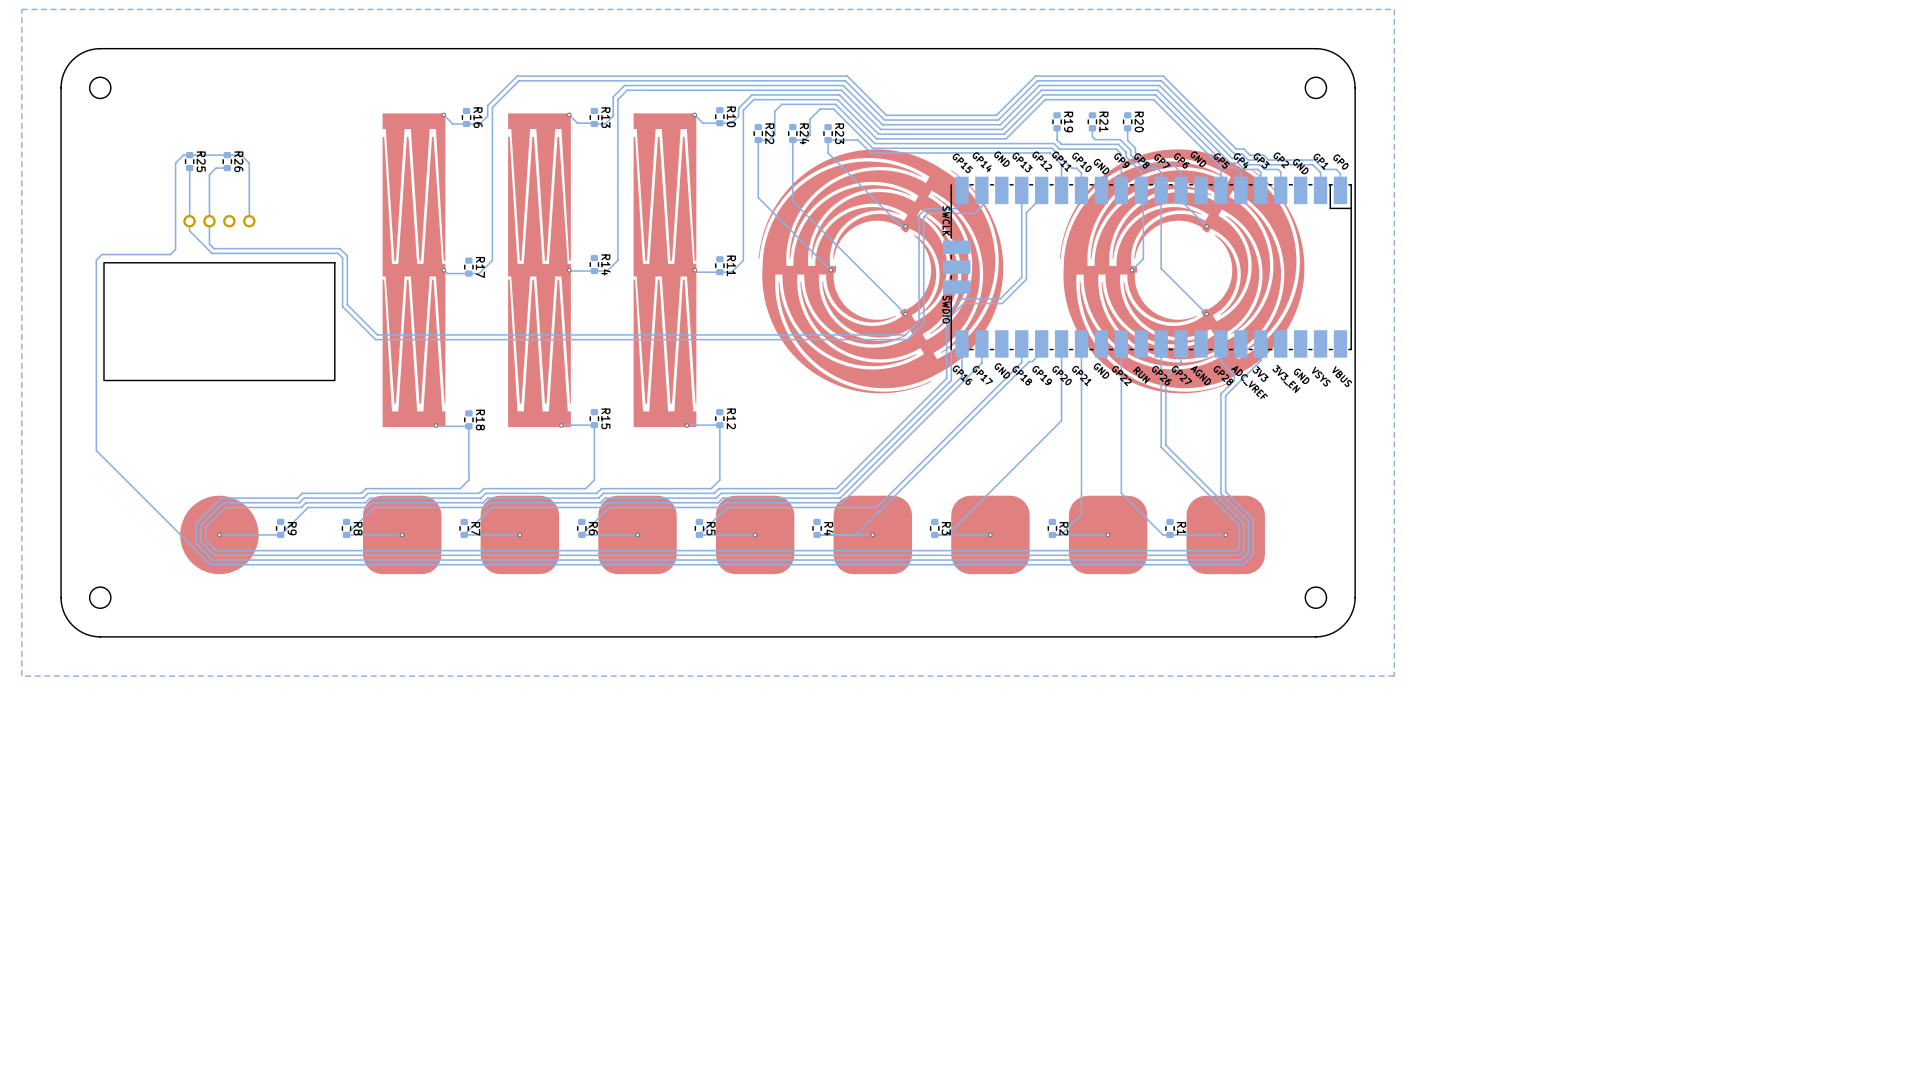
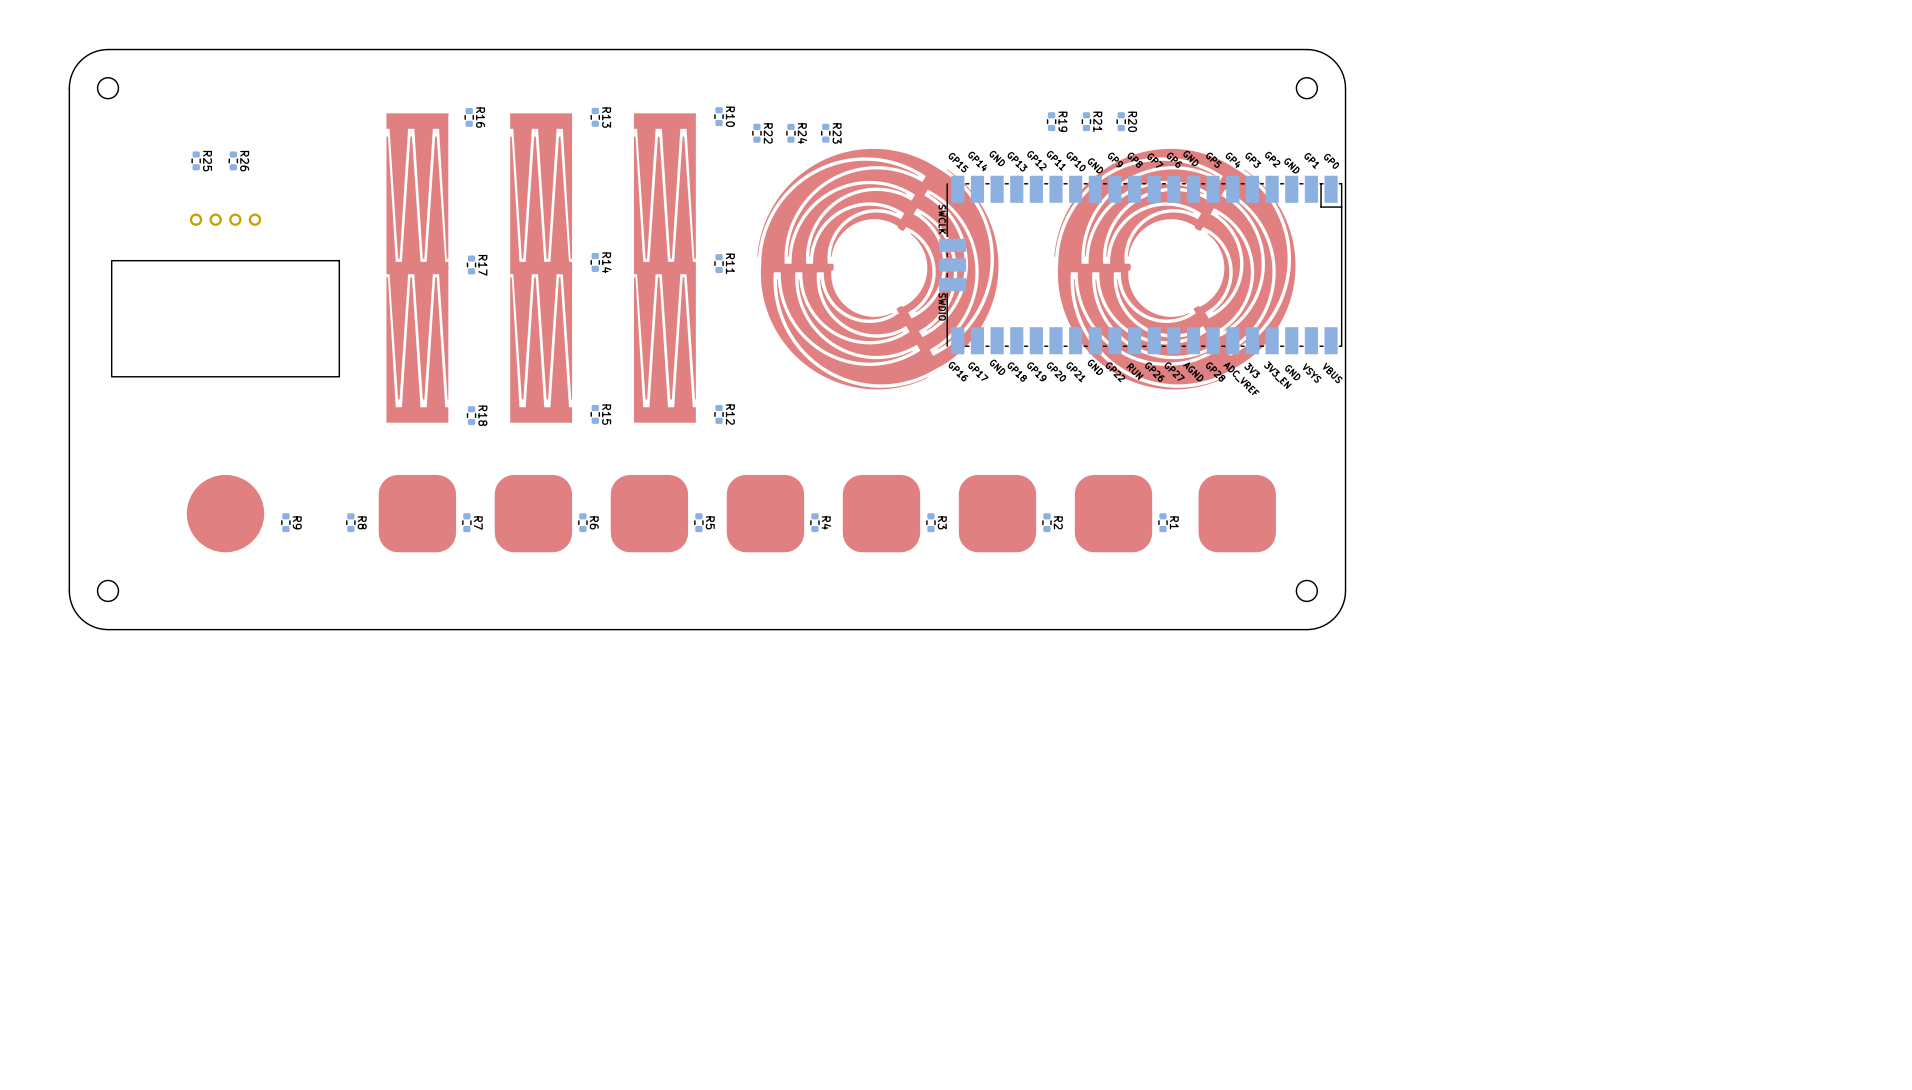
bottom zone outline: (1394, 9) (21, 9) (21, 676) (1394, 676) (1394, 9) -> none
bottom track: (443, 114) (452, 123) (479, 123) (487, 116) (487, 105) (517, 76) (847, 76) (886, 115) (996, 115) (1035, 76) (1163, 76) (1236, 149) (1243, 149) (1250, 155) (1263, 155) (1268, 160) (1314, 160) (1324, 169) (1336, 169) (1340, 173) (1340, 189) -> none
via: (443, 114) -> none
bottom track: (569, 114) (577, 123) (605, 123) (613, 116) (613, 96) (624, 85) (843, 85) (882, 124) (1000, 124) (1039, 85) (1159, 85) (1232, 158) (1240, 158) (1246, 164) (1259, 164) (1264, 169) (1278, 169) (1280, 171) (1280, 189) -> none
via: (569, 114) -> none
bottom track: (694, 114) (702, 123) (731, 123) (738, 116) (738, 108) (752, 94) (839, 94) (878, 134) (1004, 134) (1043, 94) (1155, 94) (1228, 167) (1236, 167) (1240, 172) (1240, 189) -> none
via: (694, 114) -> none
bottom track: (1057, 128) (1057, 140) (1061, 144) (1118, 144) (1126, 152) (1126, 156) (1141, 172) (1141, 189) (1143, 191) (1143, 258) (1132, 270) -> none
bottom track: (1092, 128) (1092, 136) (1095, 139) (1120, 139) (1130, 150) (1130, 154) (1144, 168) (1157, 168) (1161, 172) (1161, 268) (1206, 314) -> none
bottom track: (1127, 128) (1127, 140) (1135, 148) (1135, 152) (1146, 163) (1171, 163) (1181, 172) (1181, 200) (1206, 226) -> none
bottom track: (189, 168) (189, 230) (212, 253) (338, 253) (342, 257) (342, 306) (375, 339) (907, 339) (923, 323) (923, 217) (927, 213) (974, 213) (982, 205) (981, 189) -> none
bottom track: (227, 168) (216, 168) (209, 174) (209, 244) (213, 248) (339, 248) (347, 256) (347, 304) (377, 334) (905, 334) (919, 321) (919, 215) (925, 208) (955, 208) (961, 202) (961, 189) -> none
bottom track: (1021, 189) (1021, 277) (1000, 298) (961, 298) (946, 313) (946, 378) (836, 488) (719, 488) (714, 493) (603, 493) (598, 498) (487, 498) (483, 502) (372, 502) (367, 507) (308, 507) (280, 534) (219, 534) -> none
bottom track: (1041, 189) (1041, 197) (1026, 212) (1026, 279) (1002, 303) (963, 303) (951, 315) (951, 380) (838, 493) (721, 493) (716, 498) (605, 498) (600, 502) (489, 502) (484, 507) (373, 507) (346, 534) (402, 534) -> none
bottom track: (1061, 189) (1061, 164) (1050, 152) (870, 152) (857, 140) (828, 140) (828, 152) (901, 226) (905, 226) -> none
bottom track: (1081, 189) (1081, 173) (1076, 168) (1072, 168) (1052, 148) (872, 148) (833, 109) (820, 109) (810, 119) (810, 134) (804, 140) (792, 140) (792, 201) (905, 314) -> none
bottom track: (1121, 189) (1121, 154) (1116, 149) (1059, 149) (1053, 143) (874, 143) (835, 104) (781, 104) (774, 111) (774, 134) (769, 140) (758, 140) (758, 197) (830, 270) -> none
bottom track: (1220, 189) (1220, 167) (1153, 99) (1045, 99) (1006, 138) (876, 138) (837, 99) (753, 99) (743, 110) (743, 260) (731, 272) (696, 272) (694, 270) -> none
bottom track: (1260, 189) (1260, 172) (1257, 169) (1244, 169) (1238, 163) (1230, 163) (1157, 90) (1041, 90) (1002, 129) (880, 129) (841, 90) (627, 90) (617, 99) (617, 260) (607, 271) (569, 270) -> none
bottom track: (1320, 189) (1320, 172) (1312, 164) (1266, 164) (1261, 160) (1248, 160) (1242, 153) (1234, 153) (1161, 80) (1037, 80) (998, 120) (884, 120) (845, 80) (519, 80) (492, 107) (492, 260) (479, 273) (447, 273) (443, 270) -> none
bottom track: (249, 221) (249, 163) (241, 155) (183, 155) (175, 163) (175, 249) (170, 254) (101, 254) (96, 260) (96, 450) (210, 564) (1242, 564) (1253, 554) (1253, 519) (1225, 491) (1225, 395) (1260, 360) (1260, 336) -> none
via: (905, 226) -> none
via: (1206, 226) -> none
via: (443, 270) -> none
via: (569, 270) -> none
via: (694, 270) -> none
via: (830, 270) -> none
via: (1132, 270) -> none
via: (905, 314) -> none
via: (1206, 314) -> none
bottom track: (961, 336) (961, 376) (840, 498) (723, 498) (718, 502) (607, 502) (602, 507) (491, 507) (464, 534) (519, 534) -> none
bottom track: (981, 336) (981, 363) (842, 502) (724, 502) (720, 507) (609, 507) (581, 534) (637, 534) -> none
bottom track: (1021, 336) (1021, 362) (876, 507) (726, 507) (699, 534) (755, 534) -> none
bottom track: (1041, 336) (1041, 352) (1032, 361) (1029, 361) (855, 534) -> none
bottom track: (1061, 336) (1061, 420) (947, 534) -> none
bottom track: (1081, 336) (1081, 514) (1061, 534) -> none
bottom track: (1121, 336) (1121, 493) (1162, 534) (1225, 534) -> none
bottom track: (1161, 336) (1161, 447) (1239, 525) (1239, 548) (1237, 550) (216, 550) (205, 540) (205, 527) (225, 507) (301, 507) (306, 502) (365, 502) (370, 498) (481, 498) (485, 493) (596, 493) (601, 488) (711, 488) (719, 480) (719, 425) (686, 425) -> none
bottom track: (1181, 336) (1181, 361) (1165, 377) (1165, 445) (1243, 523) (1243, 550) (1239, 555) (214, 555) (201, 542) (201, 525) (223, 502) (299, 502) (304, 498) (363, 498) (368, 493) (479, 493) (483, 488) (585, 488) (594, 480) (594, 425) (561, 425) -> none
bottom track: (1220, 336) (1220, 361) (1234, 374) (1234, 380) (1220, 393) (1220, 493) (1248, 521) (1248, 552) (1241, 560) (212, 560) (196, 543) (196, 523) (221, 498) (297, 498) (302, 493) (361, 493) (366, 488) (460, 488) (468, 480) (468, 426) (435, 425) -> none
via: (435, 425) -> none
via: (561, 425) -> none
via: (686, 425) -> none
part position: (219, 534) -> (225, 513)
via: (219, 534) -> none
part position: (402, 534) -> (417, 513)
via: (402, 534) -> none
part position: (519, 534) -> (533, 513)
via: (519, 534) -> none
part position: (637, 534) -> (649, 513)
via: (637, 534) -> none
part position: (755, 534) -> (765, 513)
via: (755, 534) -> none
bottom track: (872, 534) (817, 534) -> none
part position: (872, 534) -> (881, 513)
via: (872, 534) -> none
bottom track: (990, 534) (934, 534) -> none
part position: (990, 534) -> (997, 513)
via: (990, 534) -> none
bottom track: (1108, 534) (1052, 534) -> none
part position: (1108, 534) -> (1113, 513)
via: (1108, 534) -> none
part position: (1225, 534) -> (1237, 513)
via: (1225, 534) -> none

